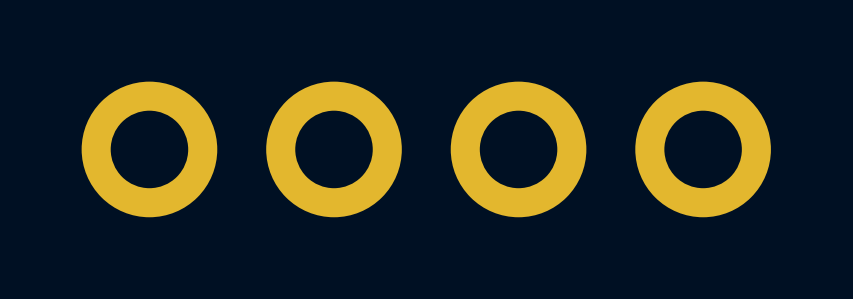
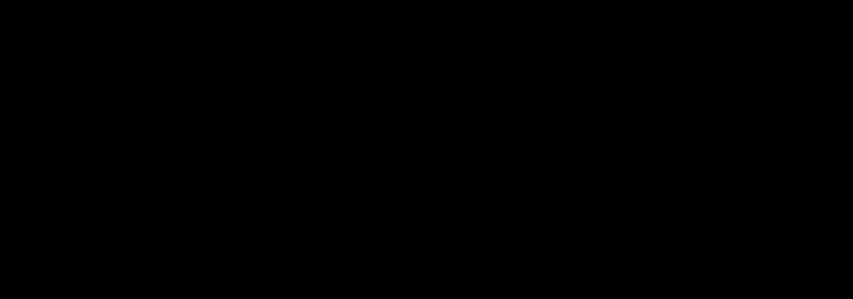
part: (149, 149) -> none
part: (334, 149) -> none
part: (518, 149) -> none
part: (703, 149) -> none

